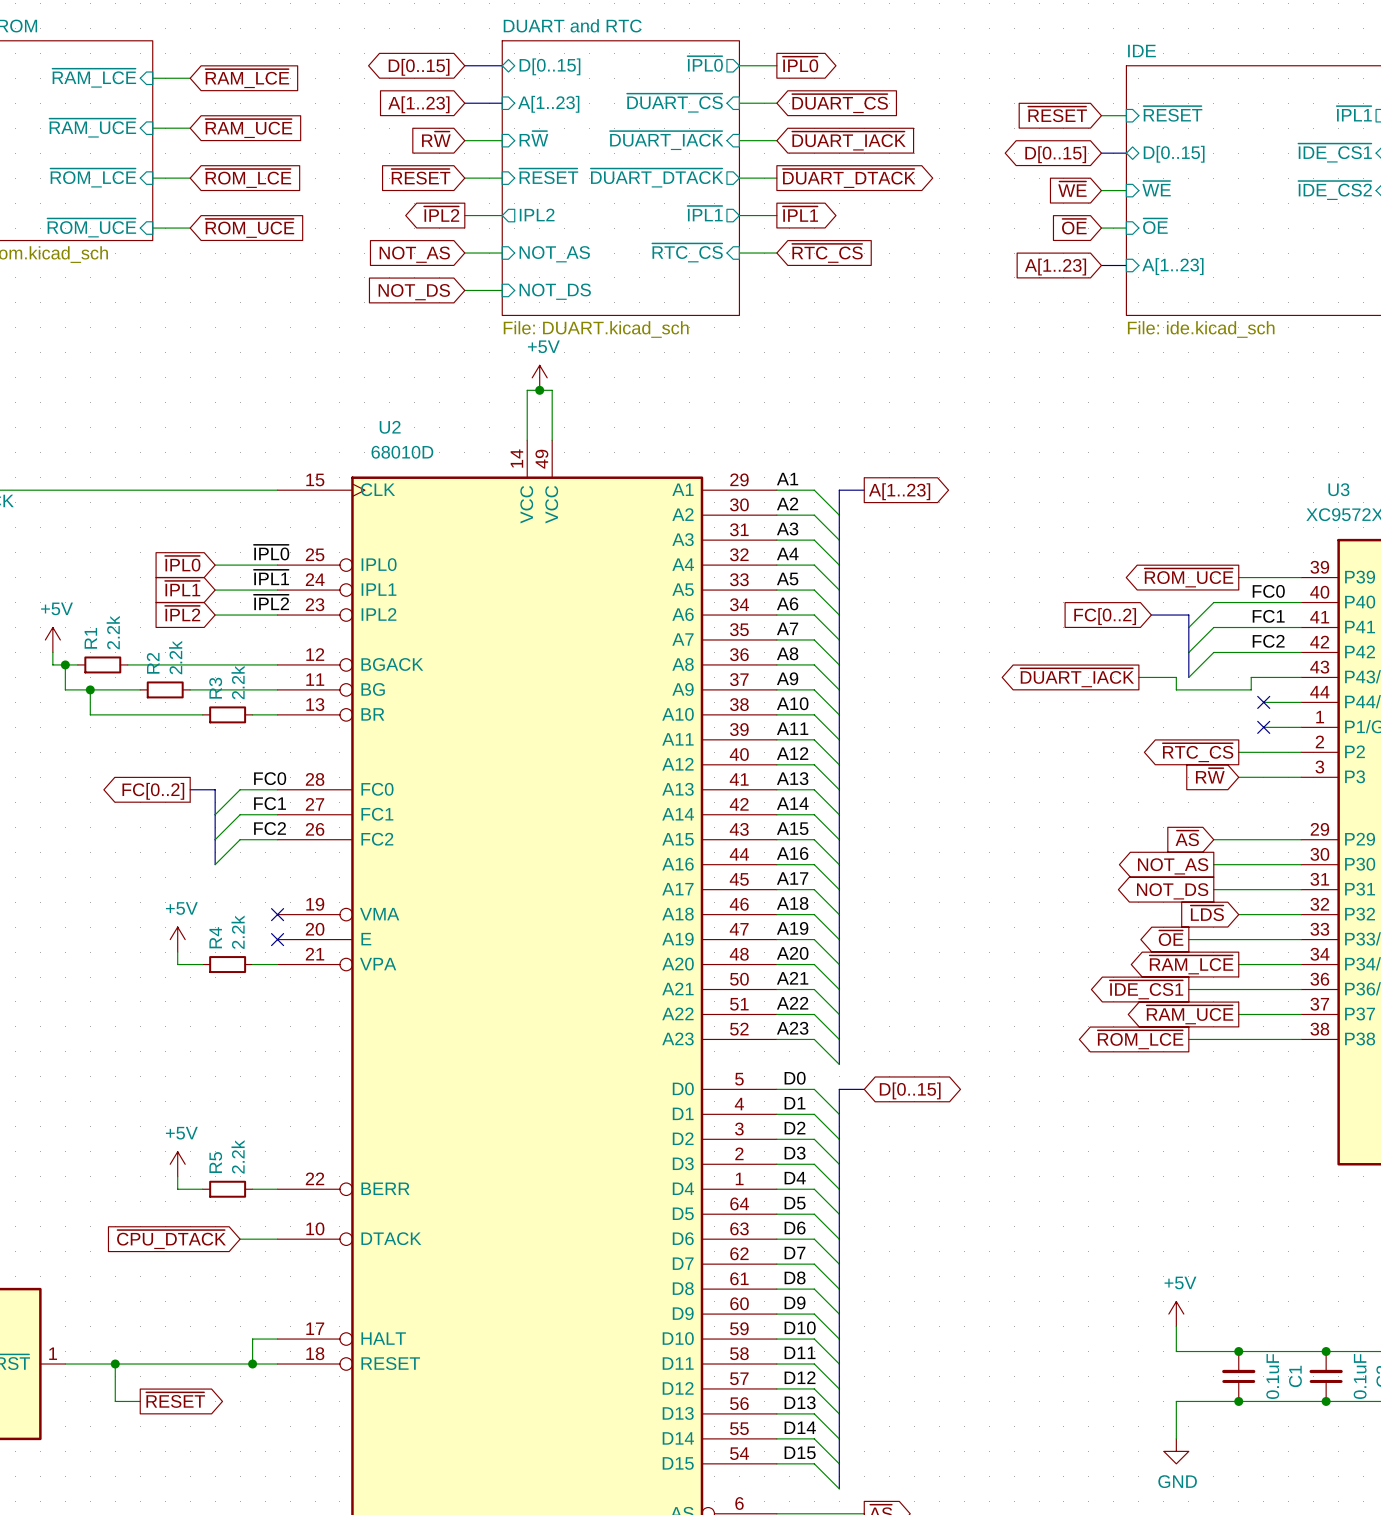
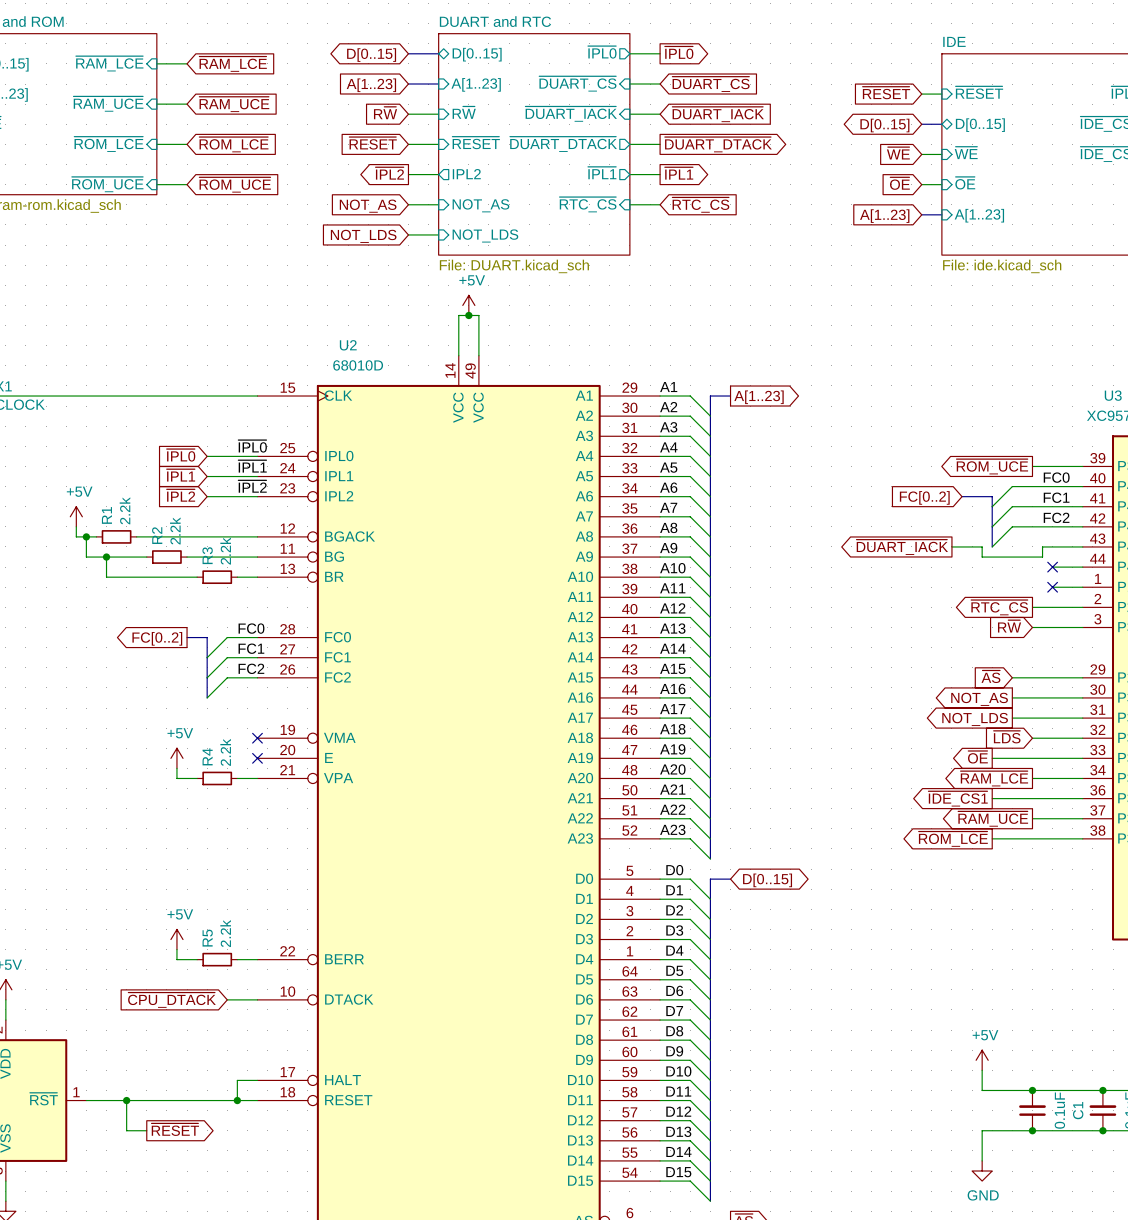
sheet pin: NOT_DS (555, 291) -> NOT_LDS (485, 235)
global label: NOT_DS (414, 292) -> NOT_LDS (363, 236)
global label: NOT_DS (1172, 891) -> NOT_LDS (975, 719)

